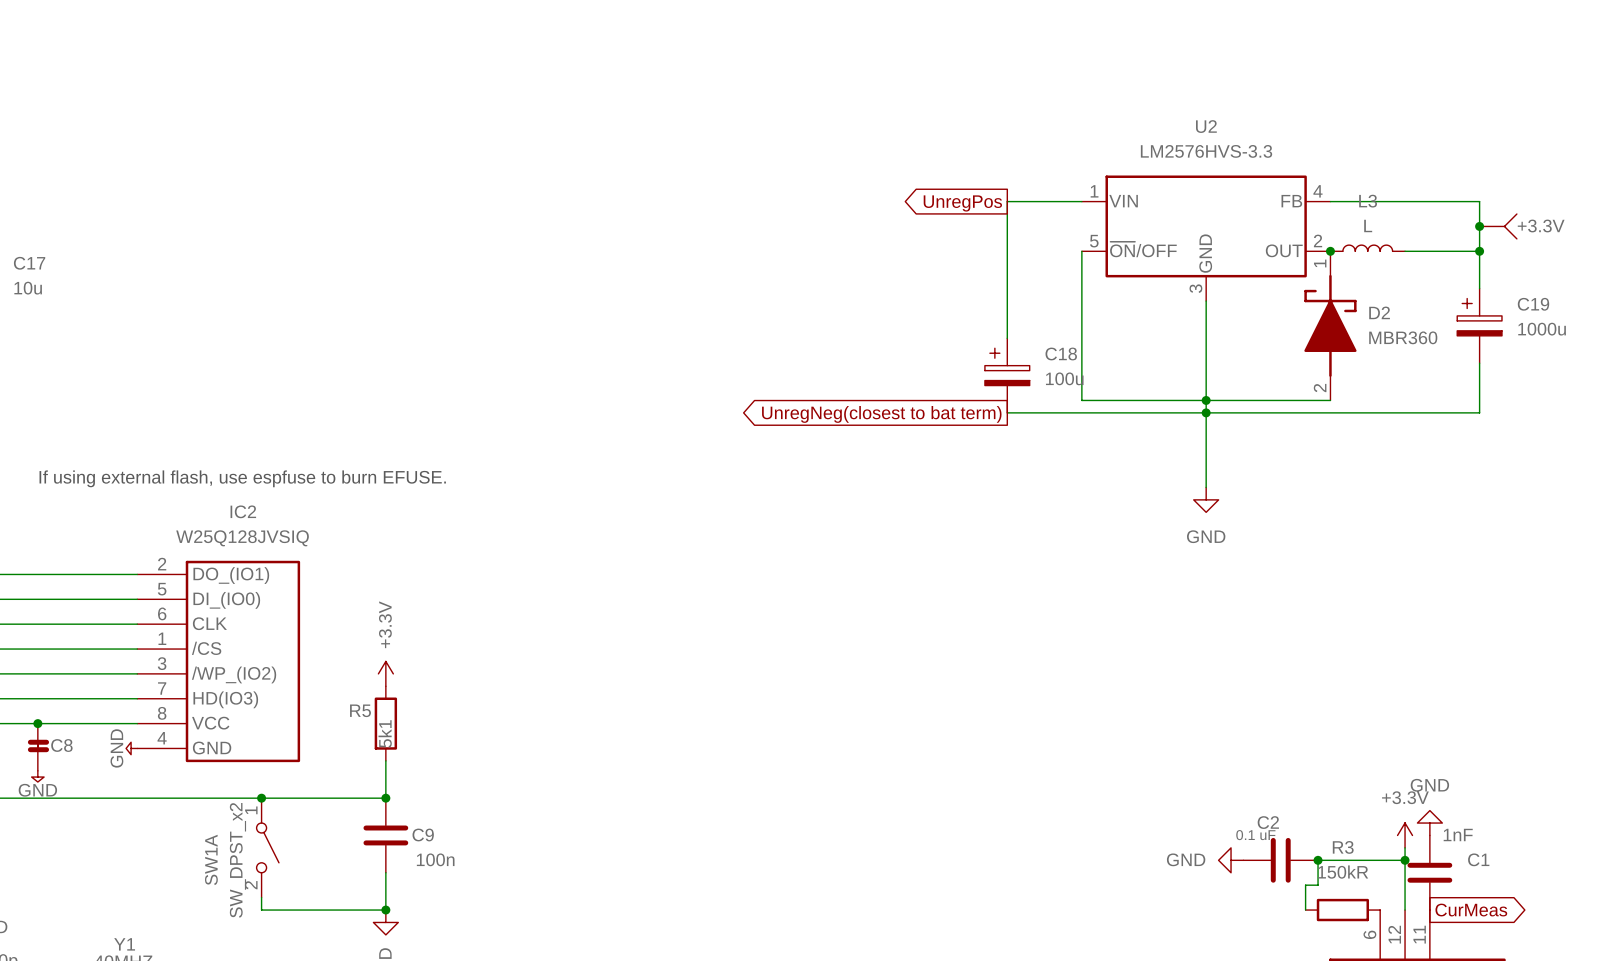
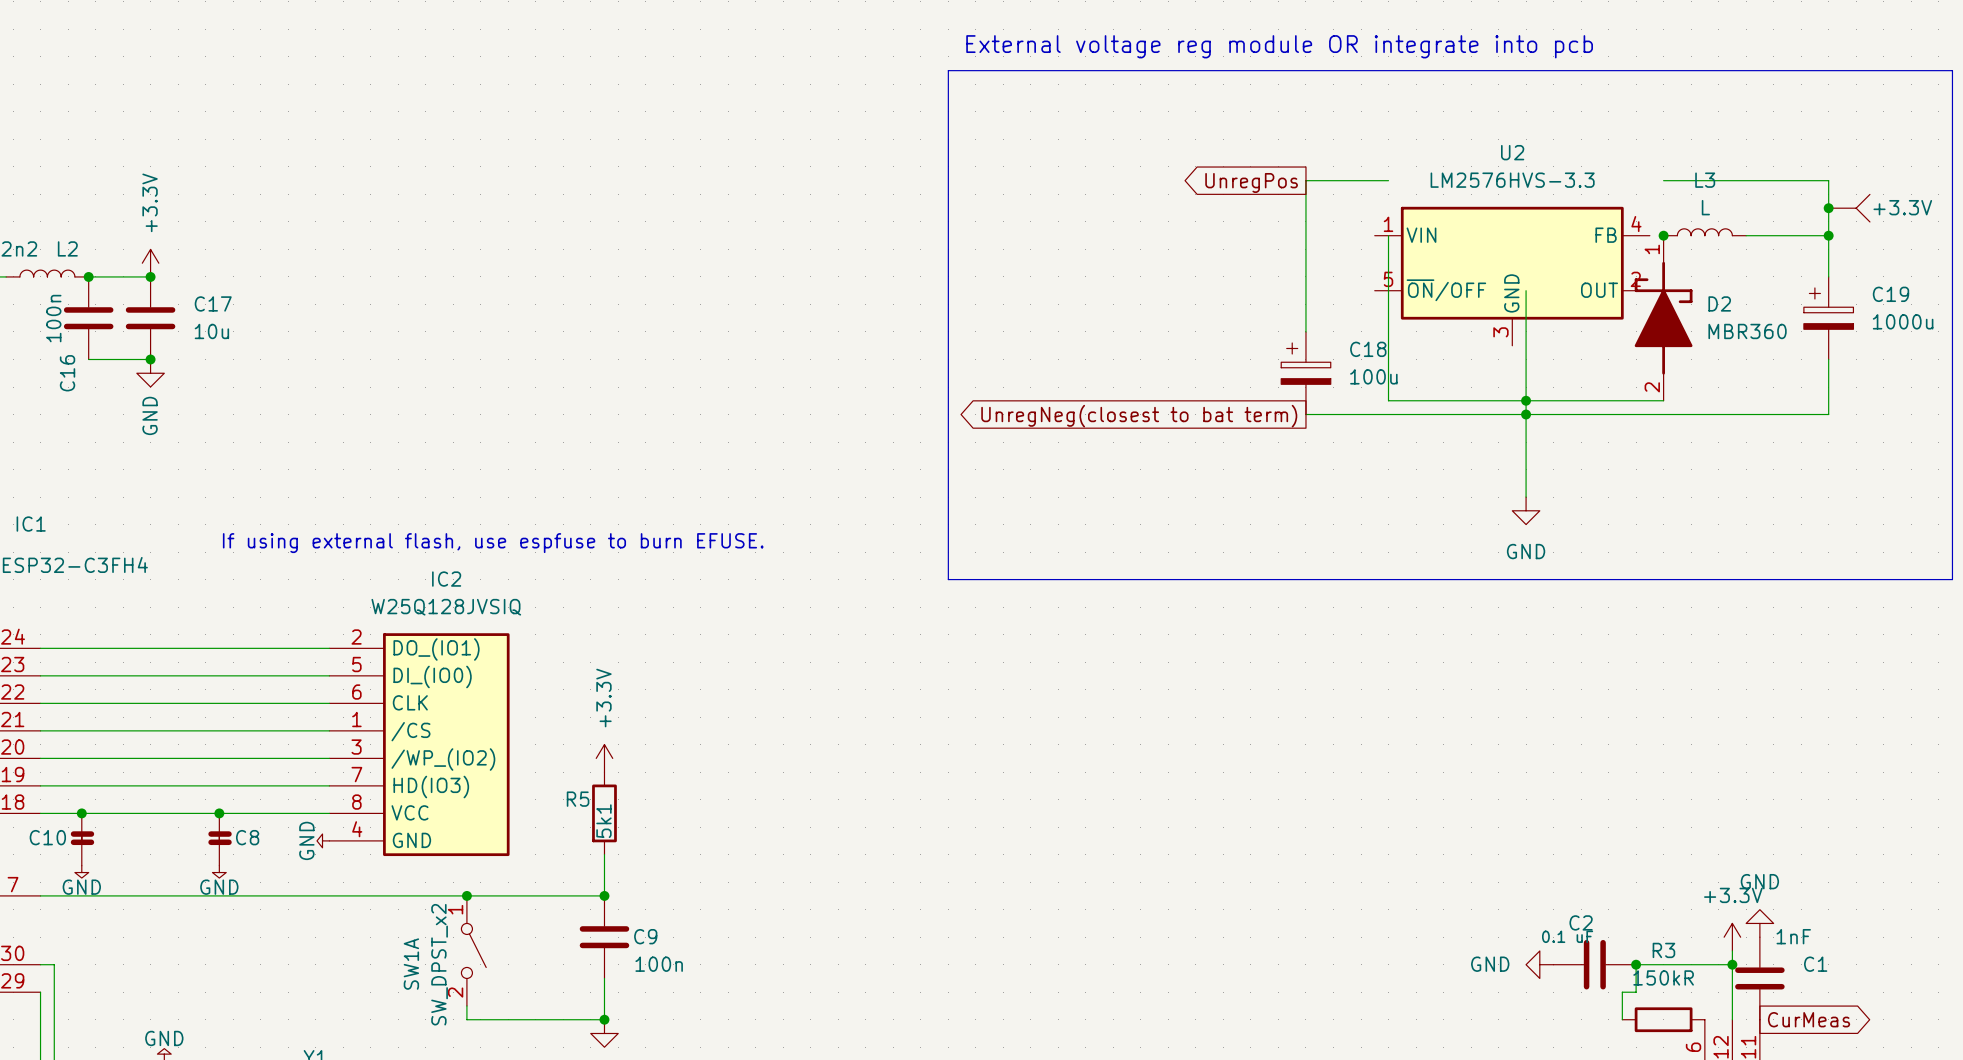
text: none -> External voltage reg module OR integrate into pcb (1279, 46)
line: none -> (948, 70) (1952, 70) (1952, 579) (948, 579) (948, 70)
wire: none -> (1663, 180) (1828, 180) (1828, 276)
junction: none -> (1828, 208)
wire: (1081, 201) (1007, 201) (1007, 338) -> (1388, 180) (1305, 180) (1305, 331)
wire: (1330, 201) (1417, 201) -> none
wire: (1479, 201) (1479, 288) -> (1814, 235) (1828, 235)
junction: none -> (1828, 235)
global label position: UnregPos (962, 203) -> UnregPos (1251, 182)
junction: (1479, 226) -> none
power symbol position: +3.3V (1498, 226) -> +3.3V (1849, 208)
L3 position: (1367, 248) -> (1704, 232)
wire: (1081, 251) (1081, 400) (1330, 400) -> (1388, 235) (1388, 400) (1663, 400)
junction position: (1330, 251) -> (1663, 235)
wire: (1405, 251) (1479, 251) -> none
junction: (1479, 251) -> none
wire: (1206, 301) (1206, 487) -> (1526, 290) (1526, 497)
D2 position: (1330, 325) -> (1663, 318)
C19 position: (1479, 325) -> (1828, 318)
junction: none -> (1526, 400)
junction: none -> (1526, 414)
wire: (1479, 363) (1479, 412) (1007, 412) -> (1828, 359) (1828, 414) (1305, 414)
C18 position: (1007, 375) -> (1305, 373)
junction: (1206, 400) -> none
junction: (1206, 412) -> none
global label position: UnregNeg(closest to bat term) (881, 414) -> UnregNeg(closest to bat term) (1139, 416)
power symbol position: GND (1206, 499) -> GND (1526, 510)

